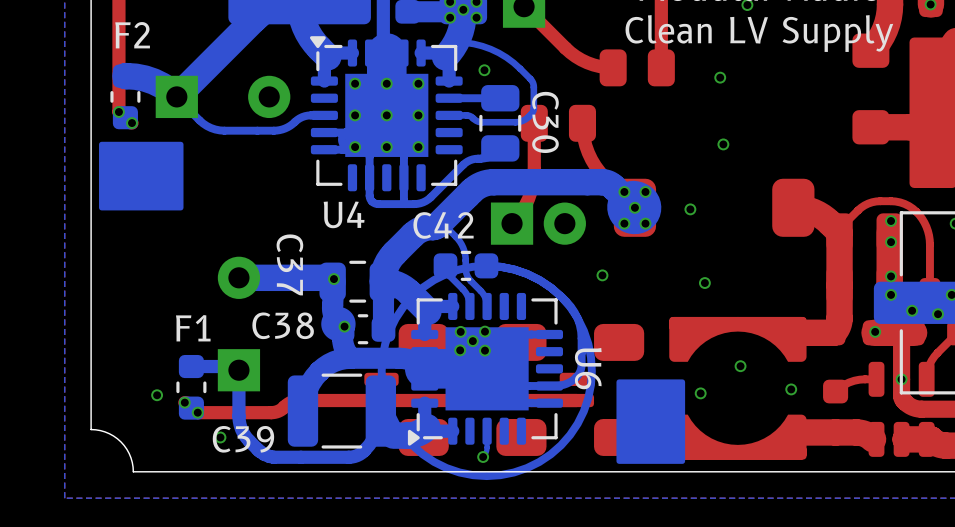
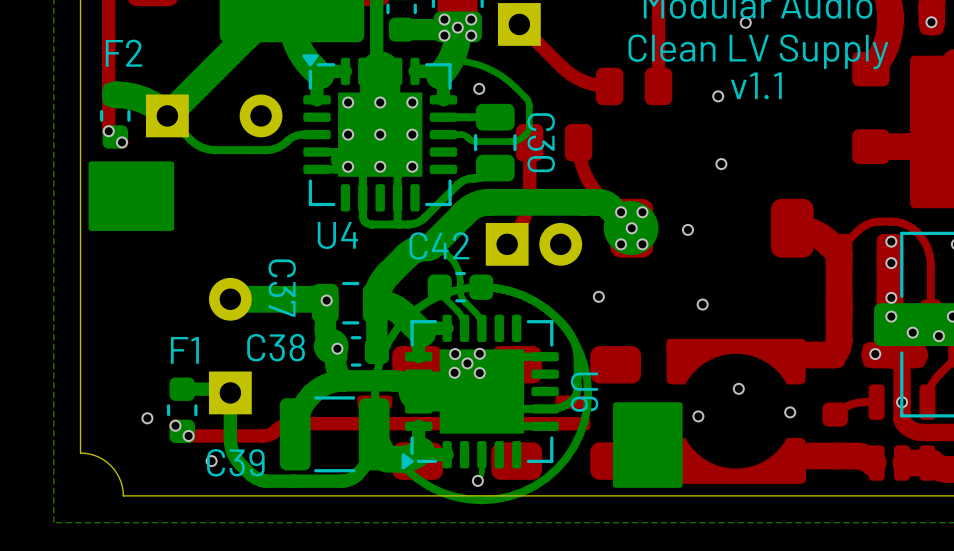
text: none -> v1.1 (756, 85)

